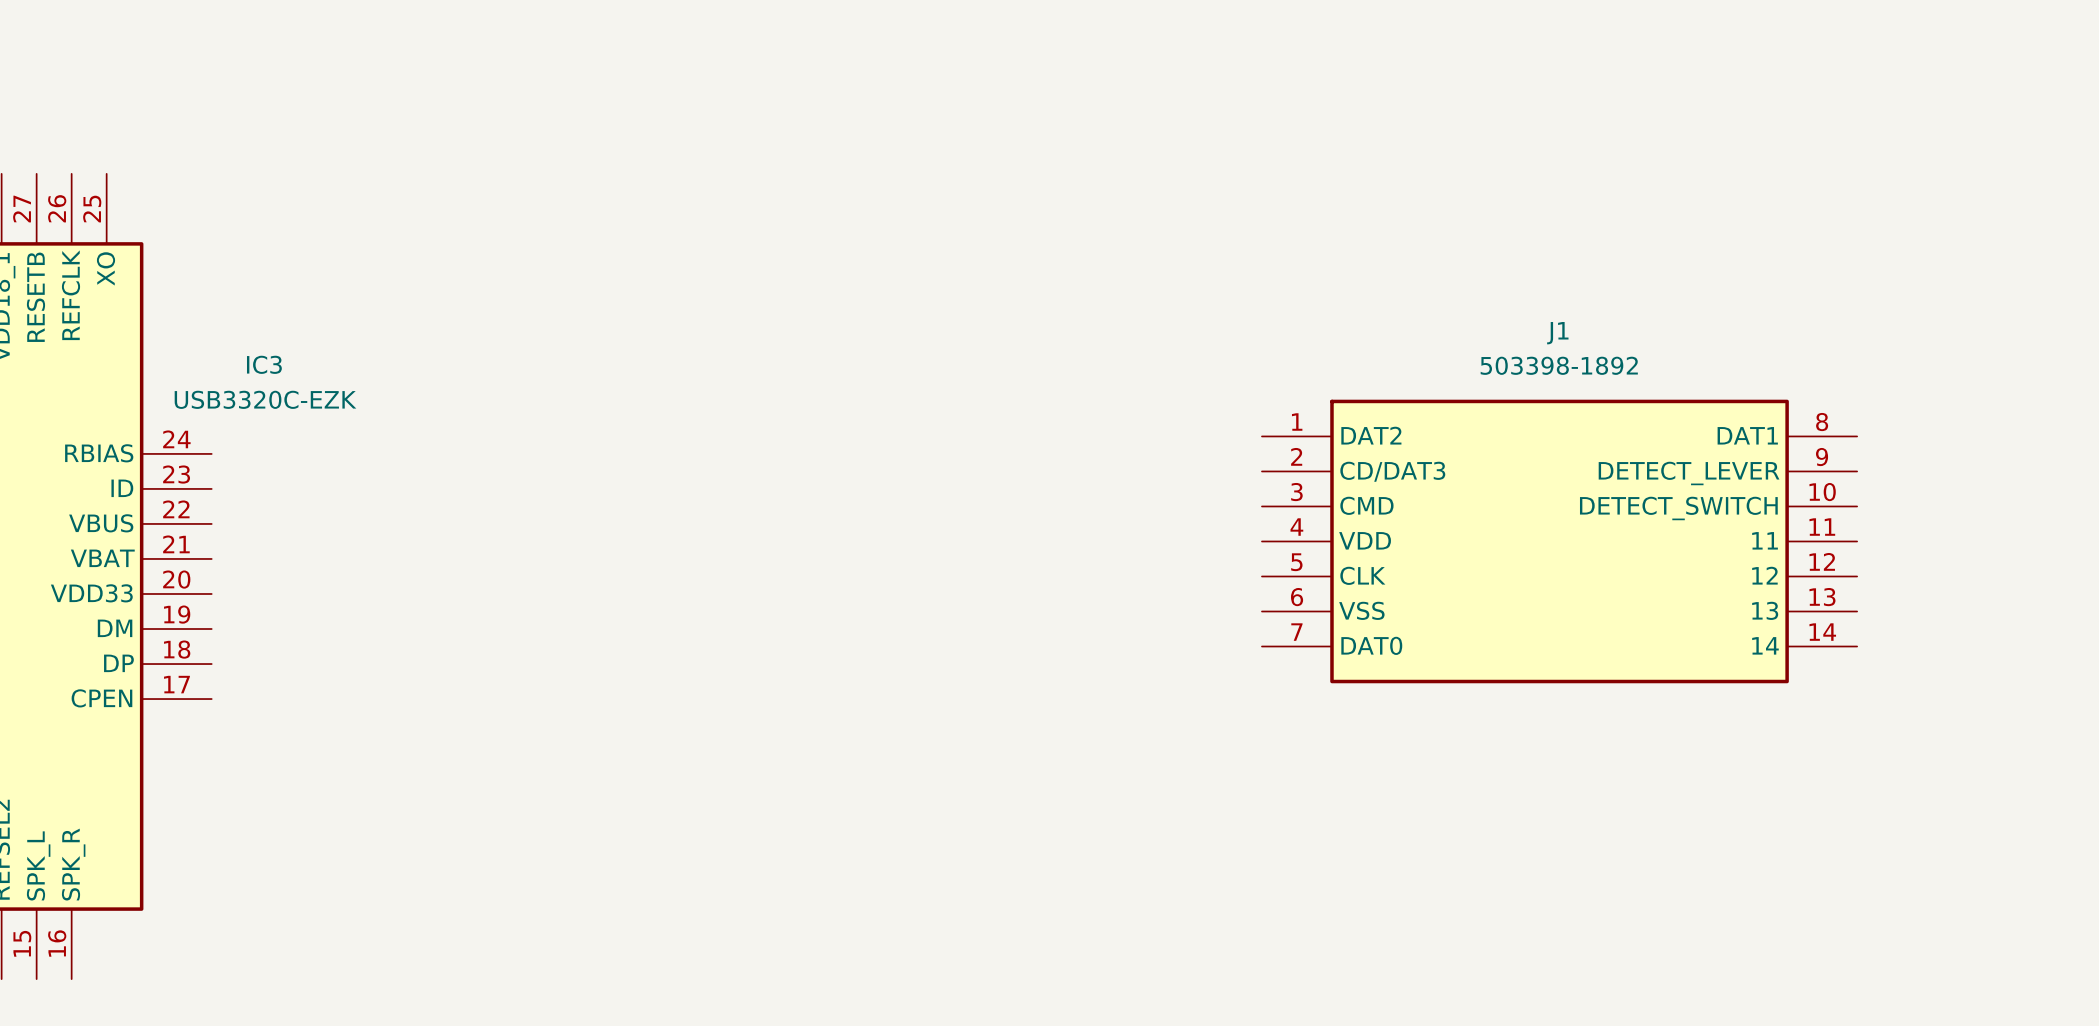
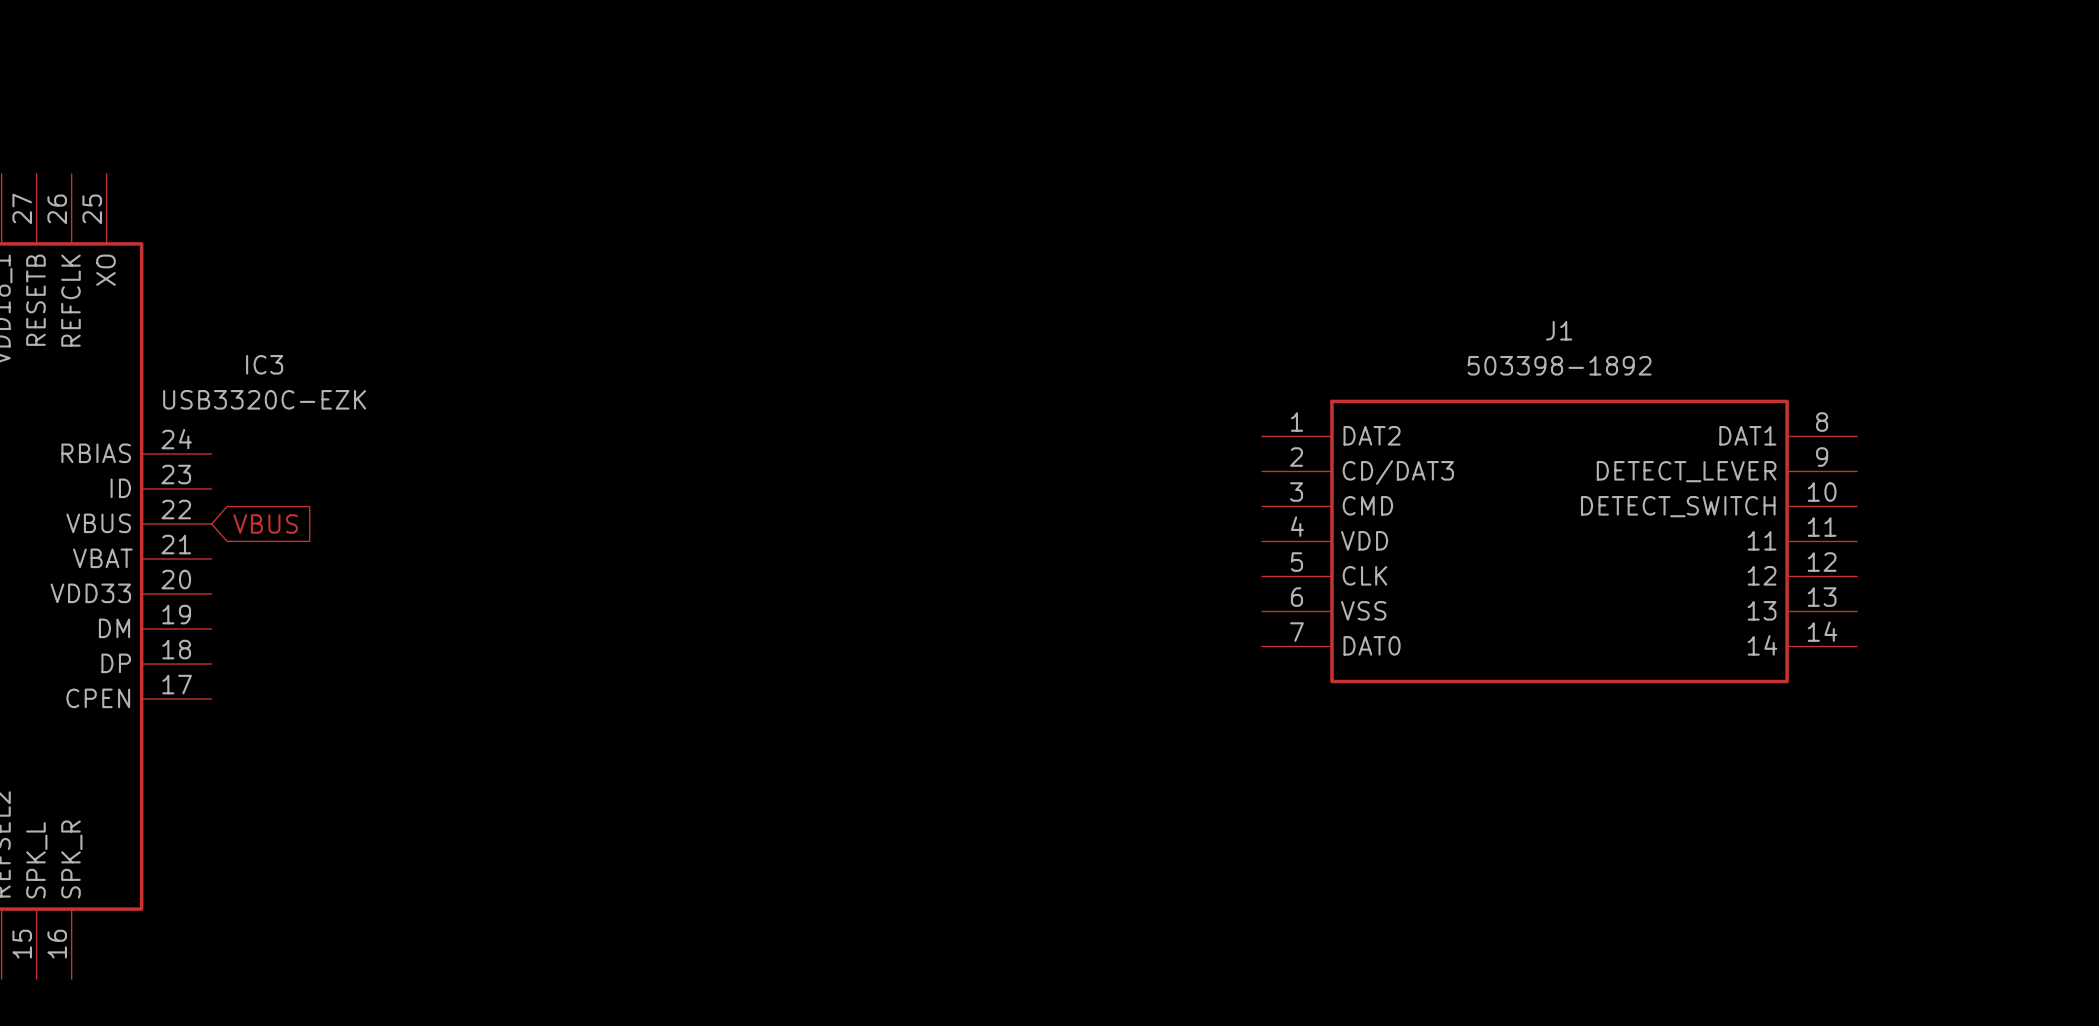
global label: none -> VBUS (265, 523)

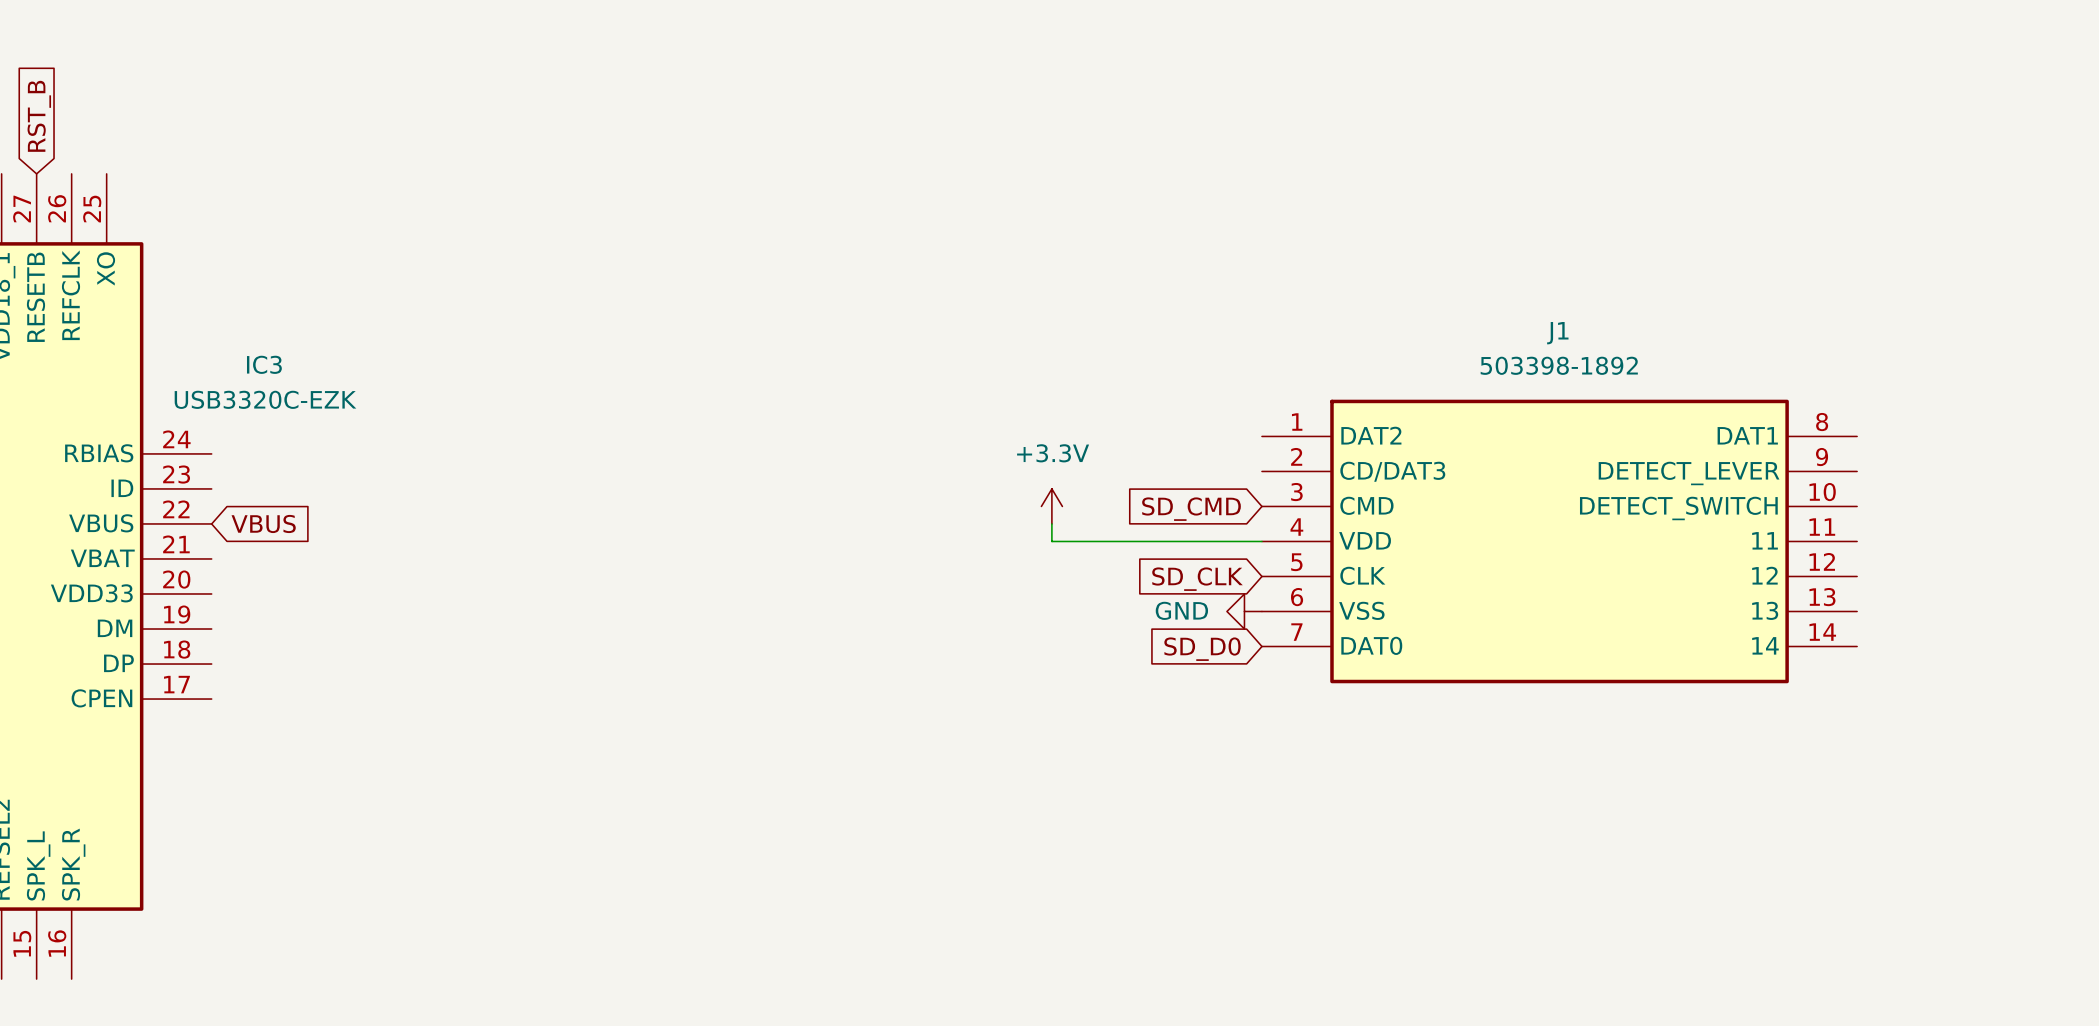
global label: none -> RST_B (39, 116)
power symbol: none -> +3.3V (1051, 506)
global label: none -> SD_CMD (1191, 509)
wire: none -> (1051, 523) (1051, 541) (1261, 541)
global label: none -> SD_CLK (1197, 579)
power symbol: none -> GND (1244, 611)
global label: none -> SD_D0 (1202, 649)

